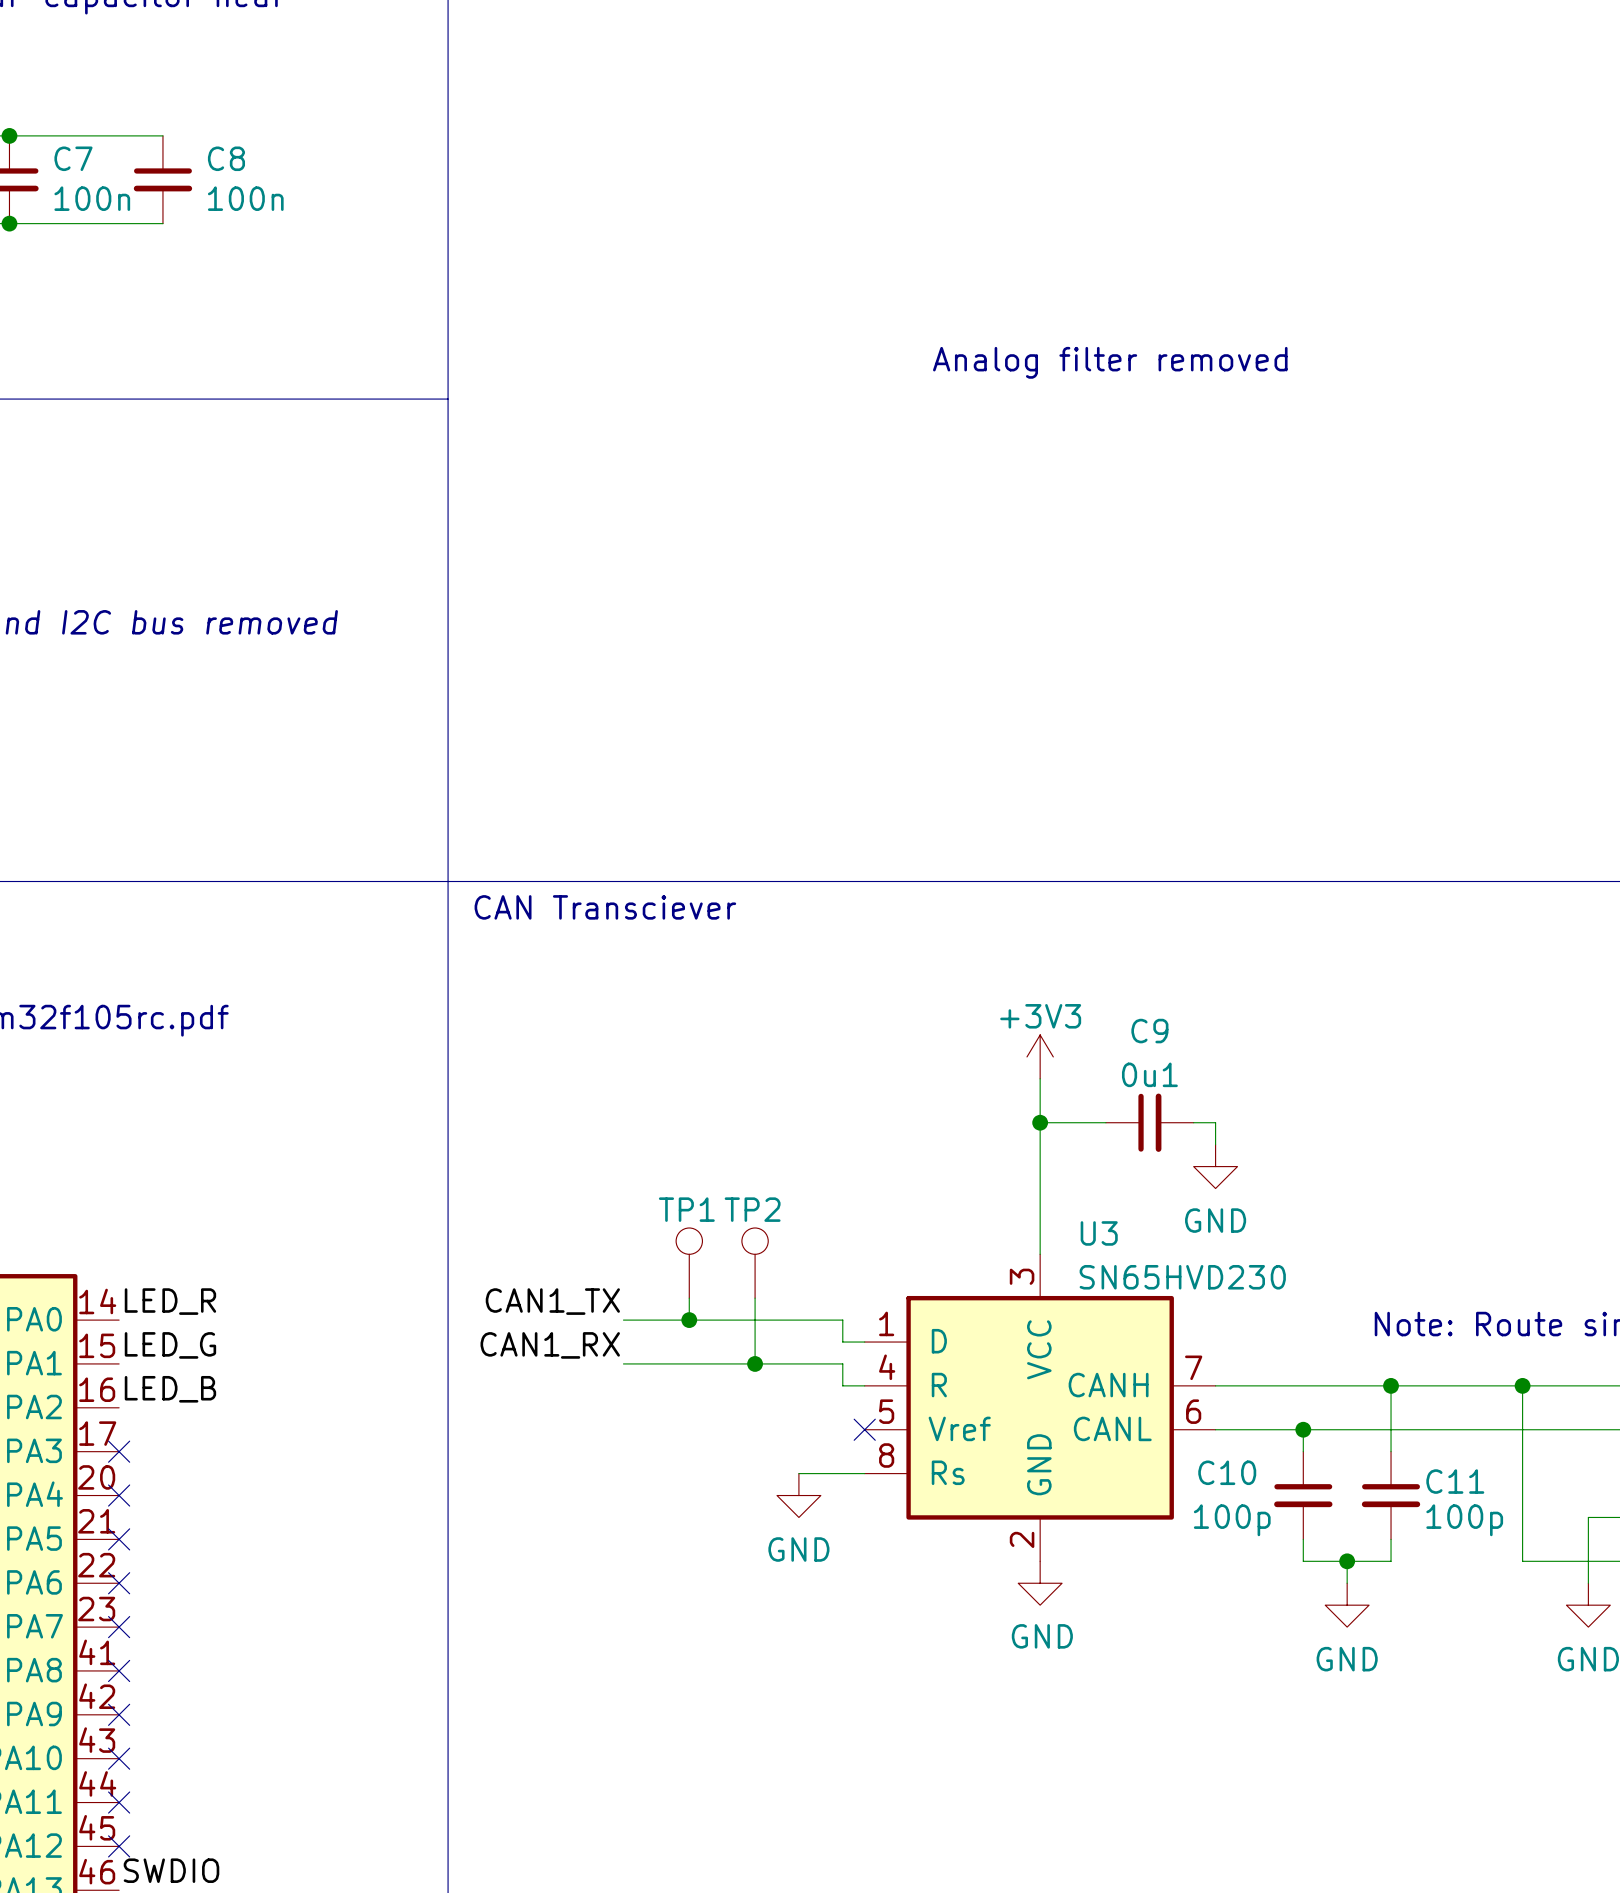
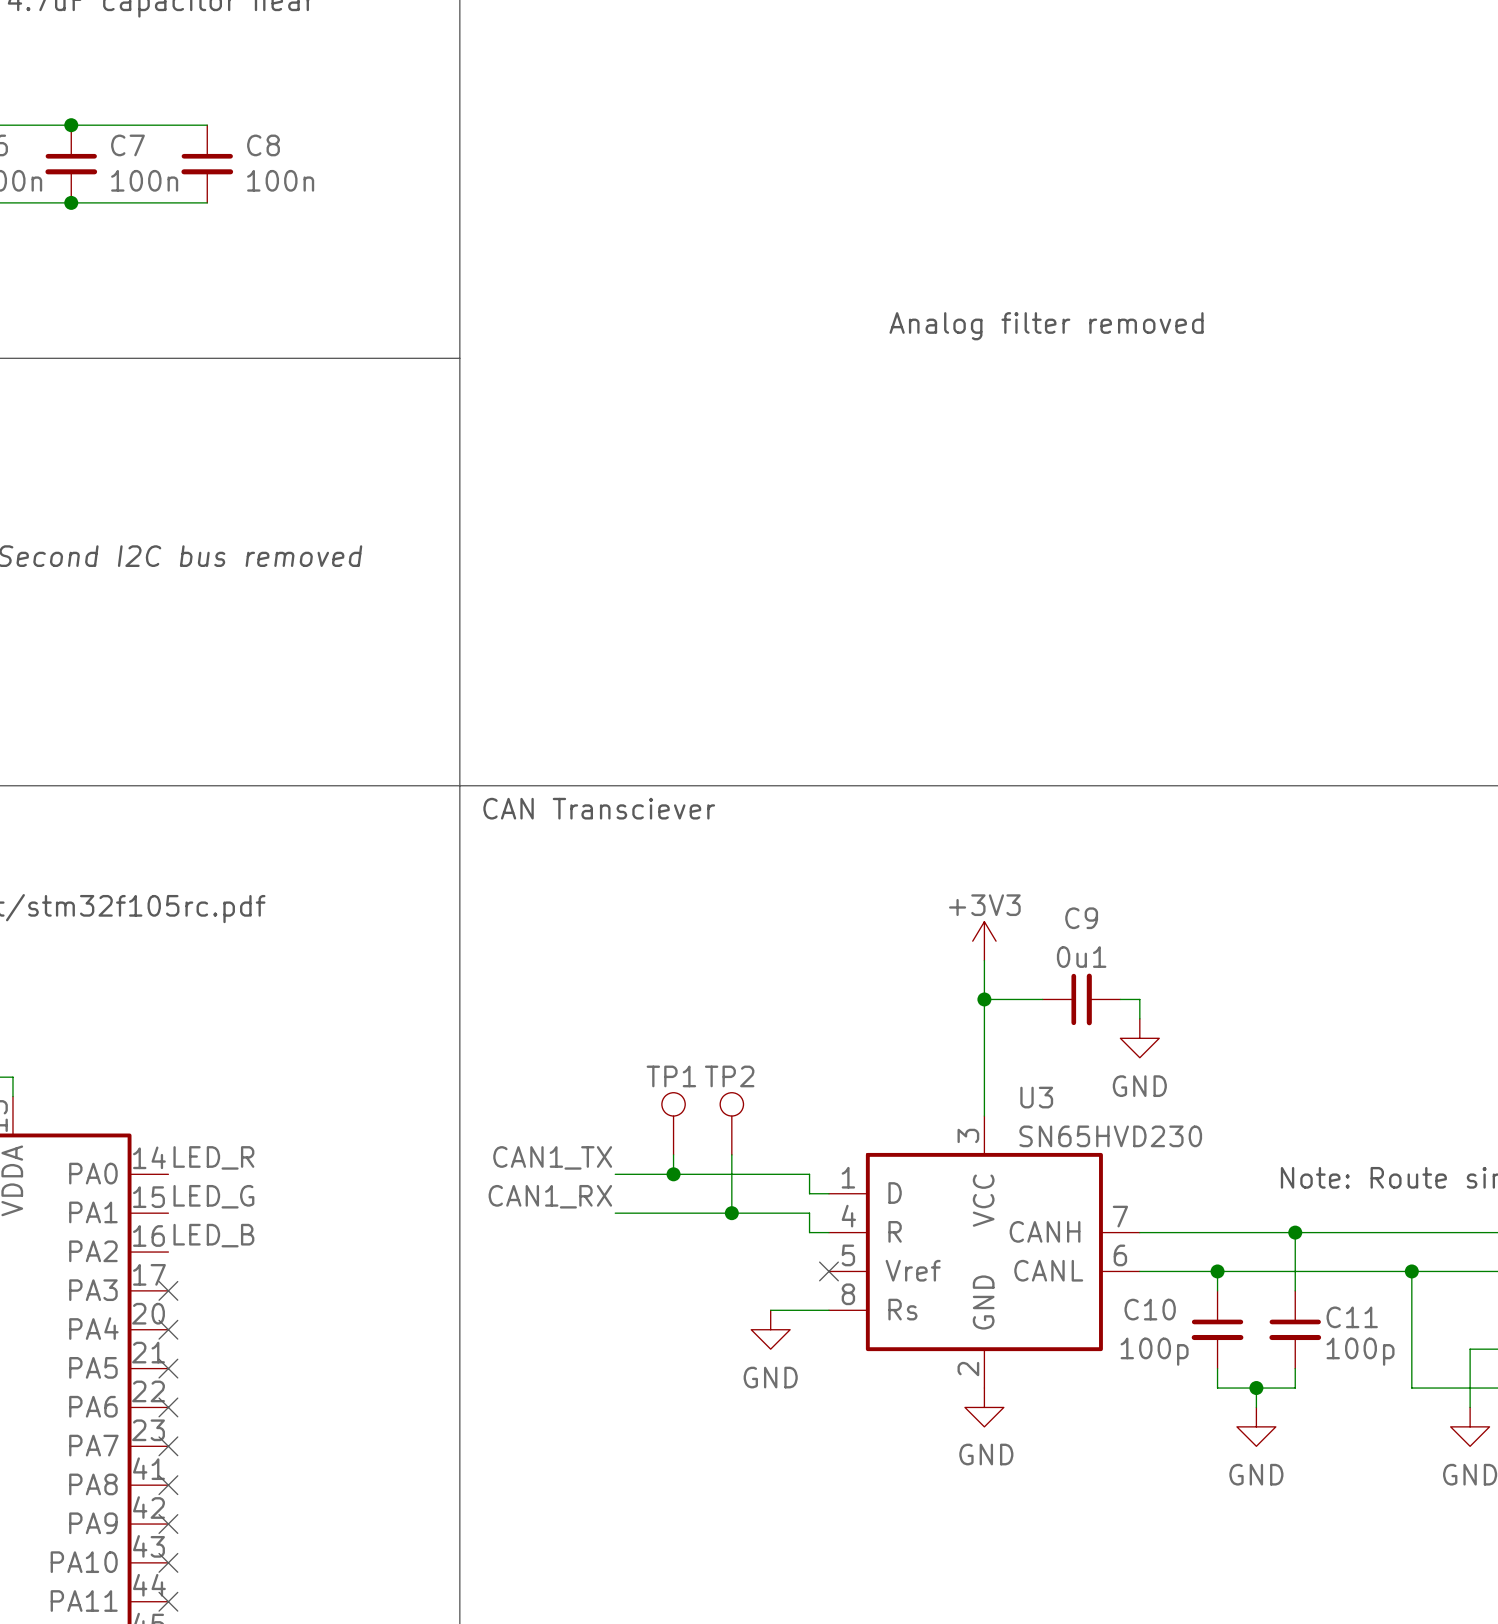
wire: (1522, 1385) (1522, 1429) -> none
junction position: (1522, 1385) -> (1411, 1271)

